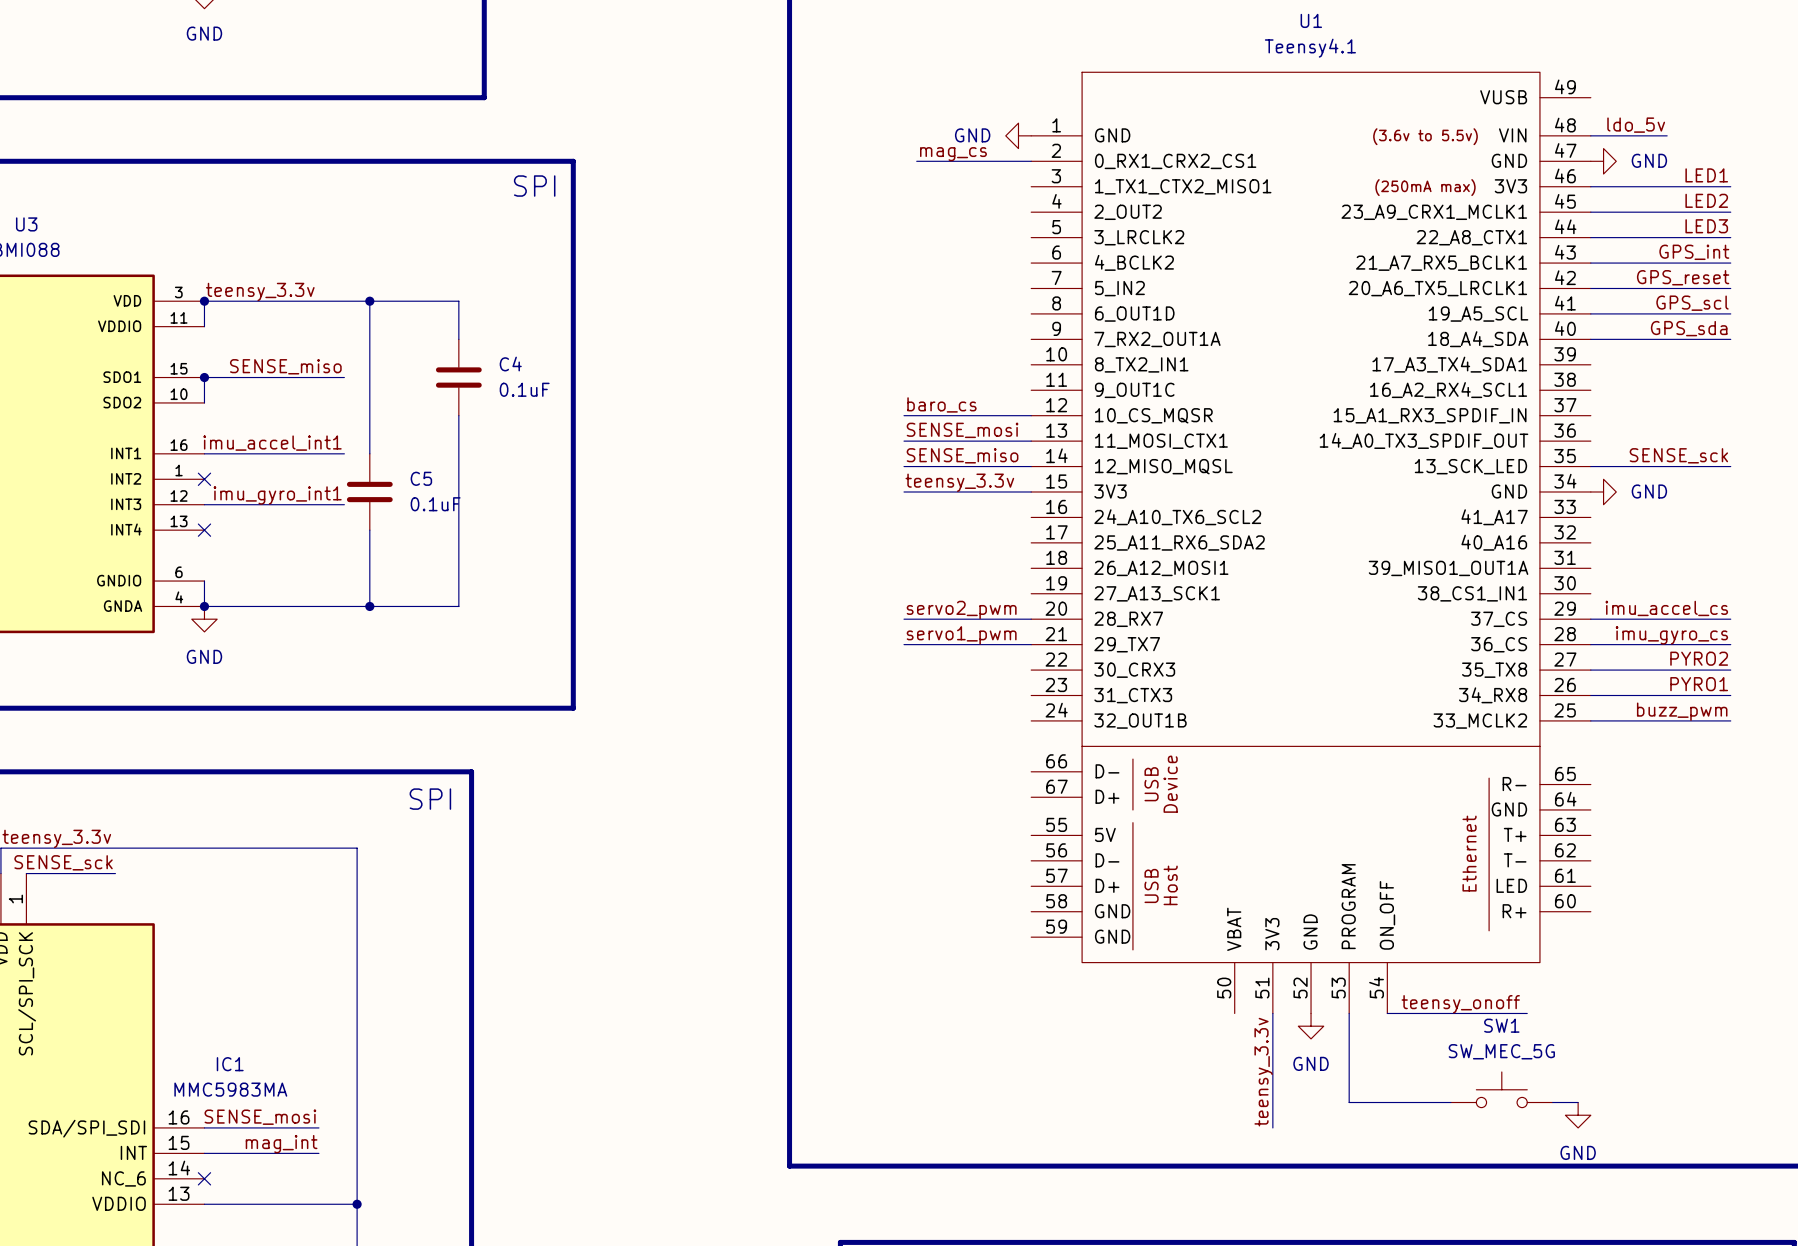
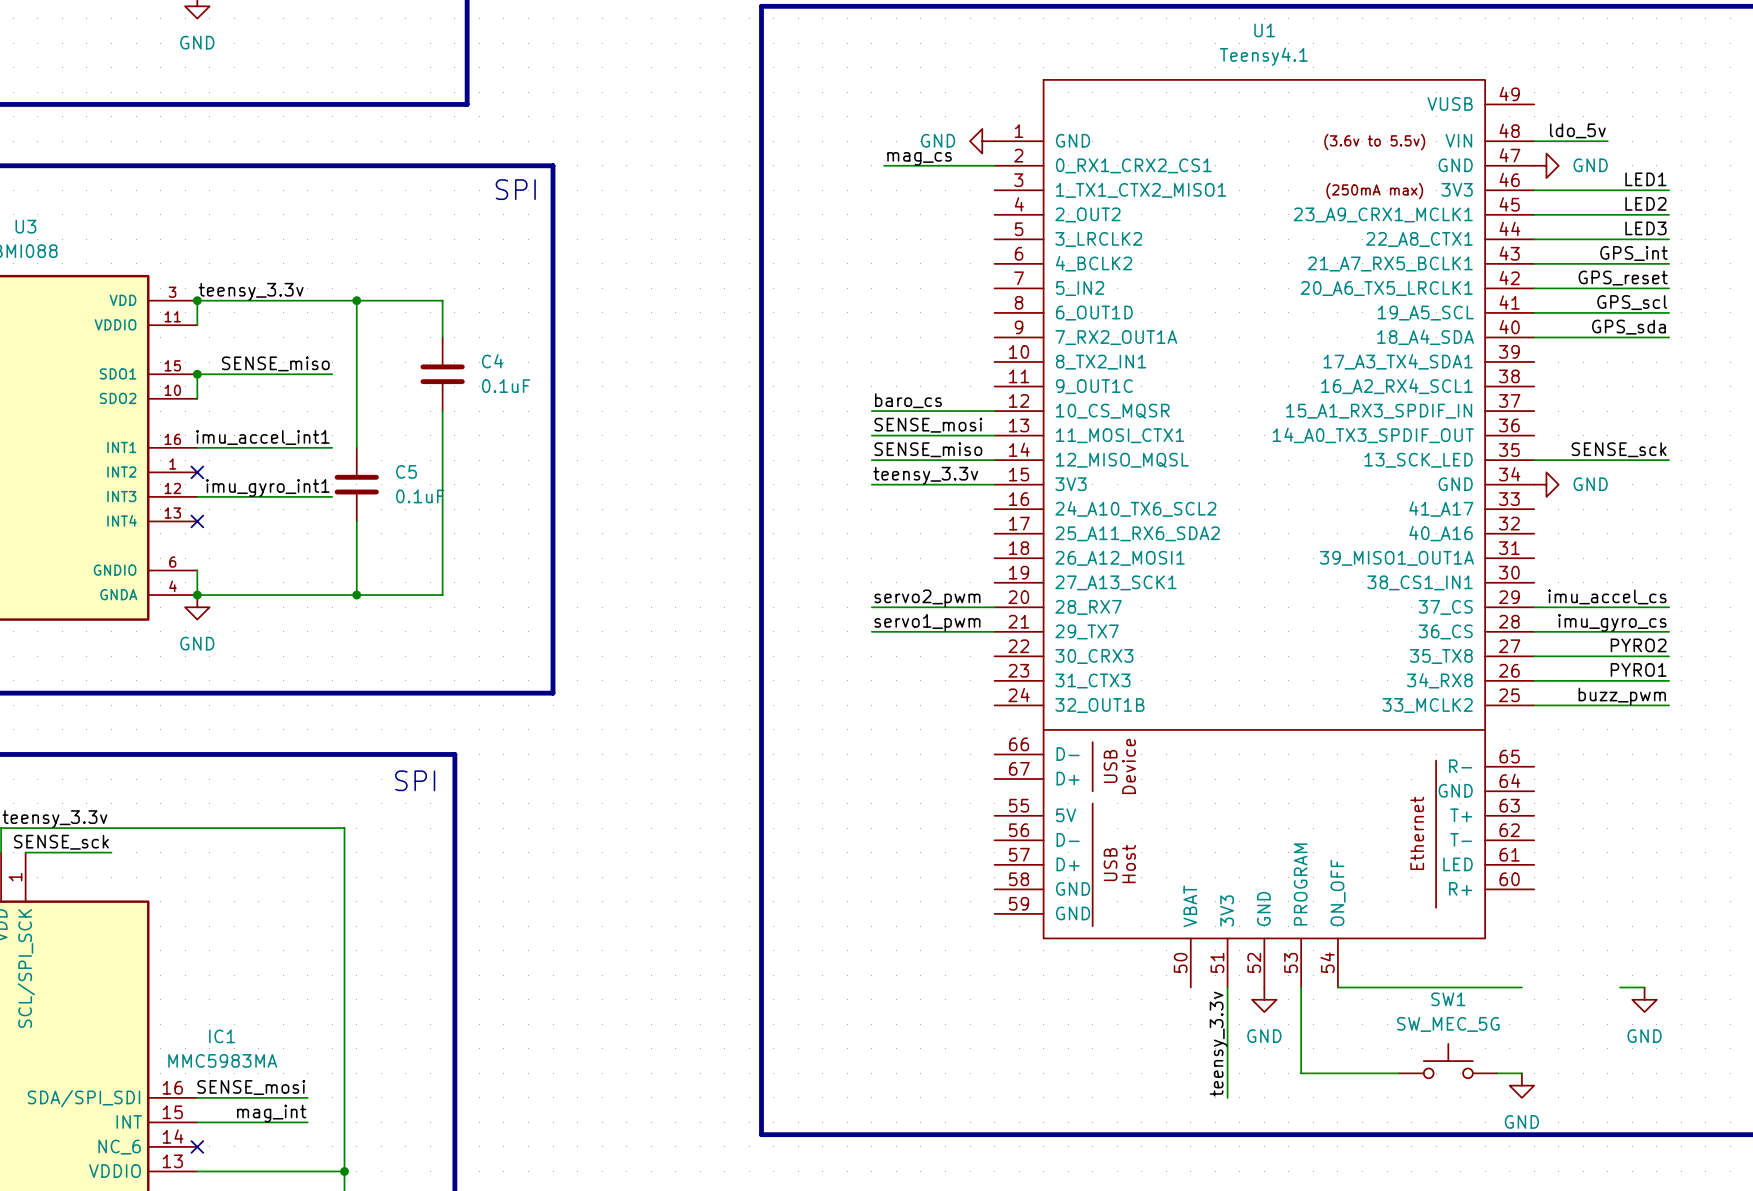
label: teensy_onoff (1460, 1004) -> none
wire: none -> (1472, 987) (1521, 987)
wire: none -> (1620, 987) (1644, 987)
power symbol: none -> GND (1644, 999)

